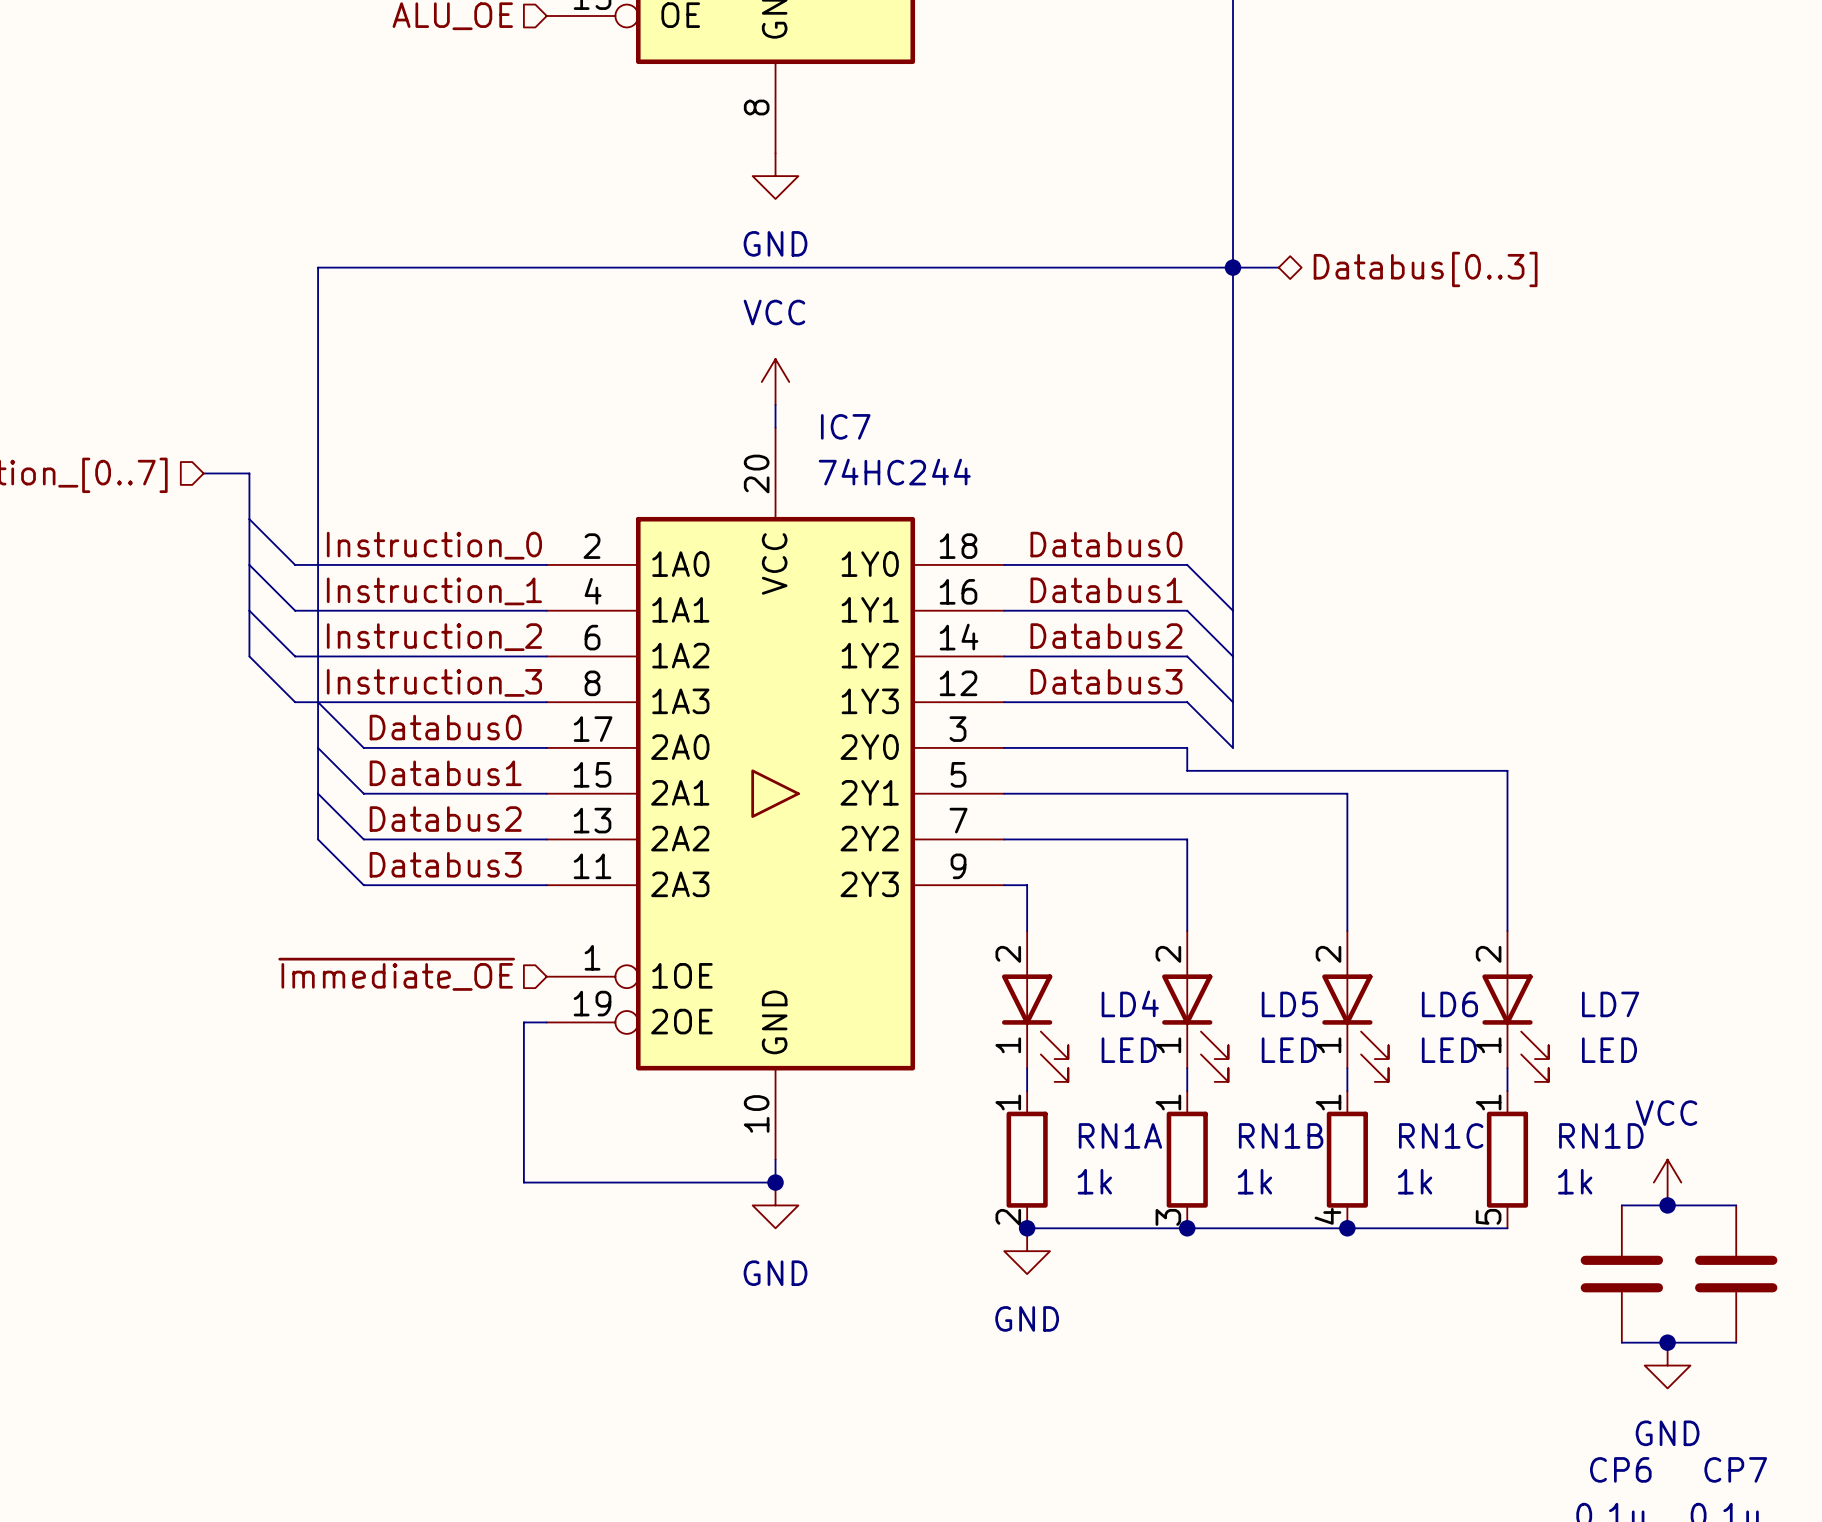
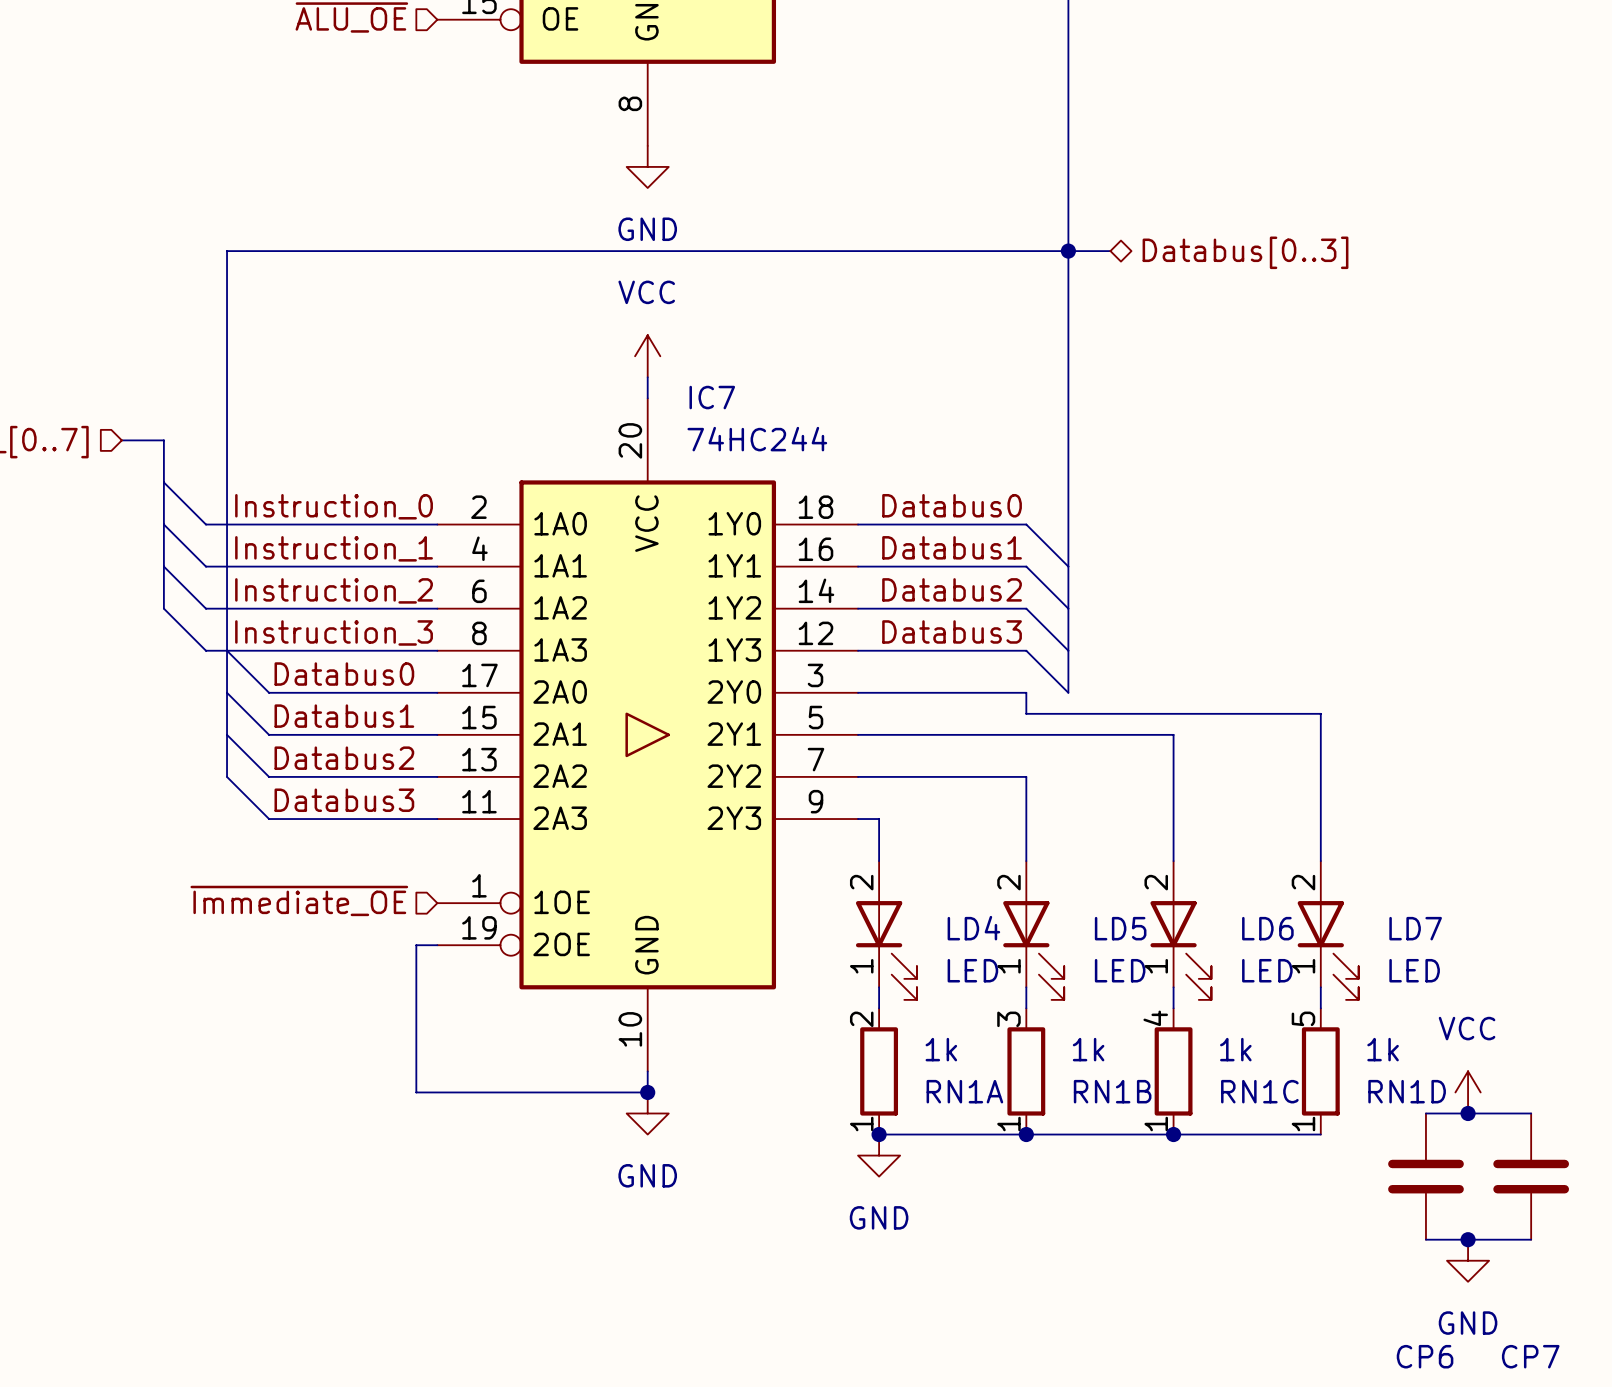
RN1A name position: RN1A (1120, 1135) -> RN1A (964, 1091)
RN1B name position: RN1B (1281, 1135) -> RN1B (1112, 1091)
RN1C name position: RN1C (1441, 1135) -> RN1C (1259, 1091)
RN1D name position: RN1D (1601, 1135) -> RN1D (1407, 1091)
RN1A rotation: 0° (1027, 1159) -> 180° (879, 1071)
RN1B rotation: 0° (1187, 1159) -> 180° (1026, 1071)
RN1C rotation: 0° (1347, 1159) -> 180° (1173, 1071)
RN1D rotation: 0° (1507, 1159) -> 180° (1320, 1071)
RN1A value position: 1k (1094, 1181) -> 1k (941, 1049)
RN1B value position: 1k (1254, 1181) -> 1k (1088, 1049)
RN1C value position: 1k (1415, 1181) -> 1k (1235, 1049)
RN1D value position: 1k (1575, 1181) -> 1k (1383, 1049)

